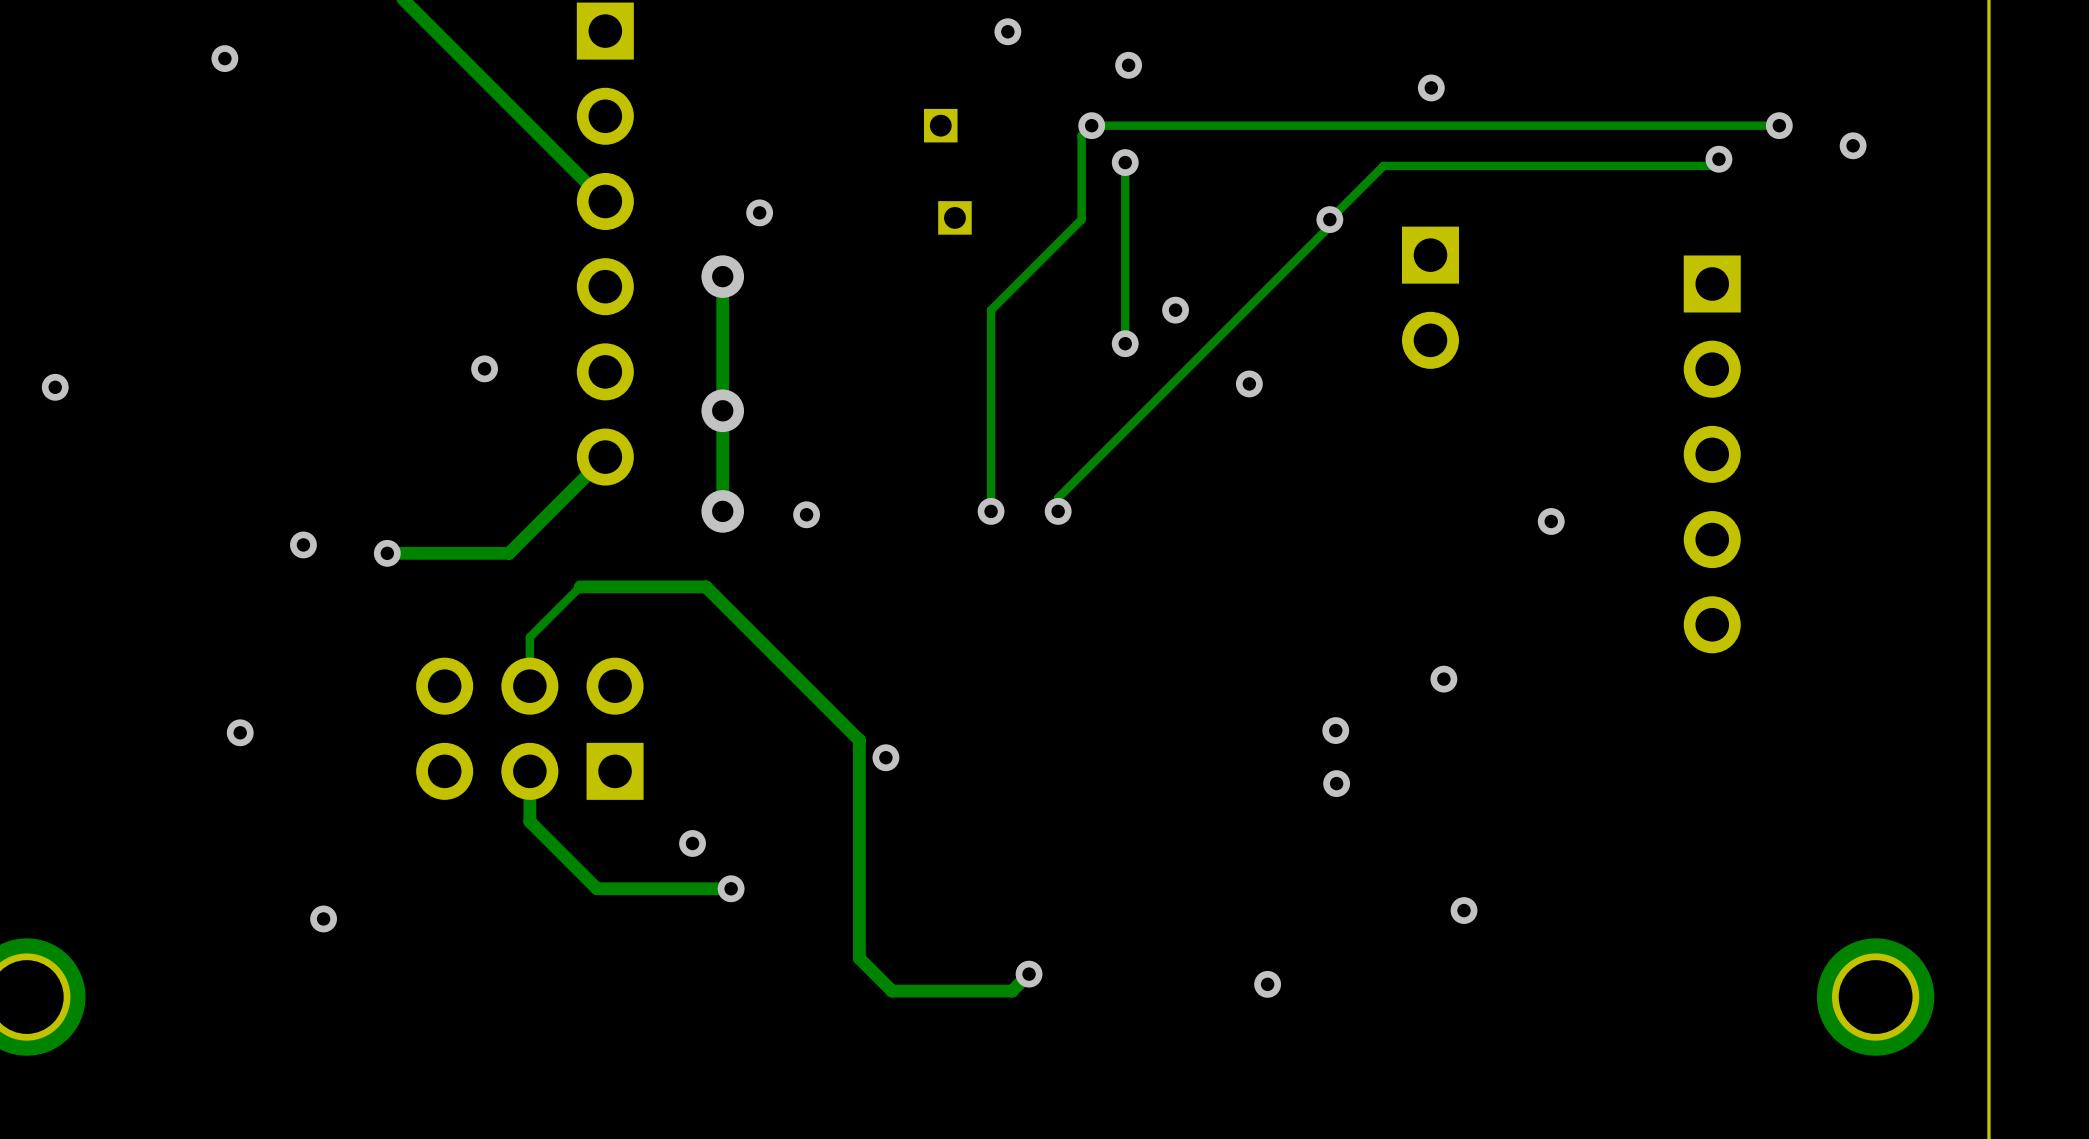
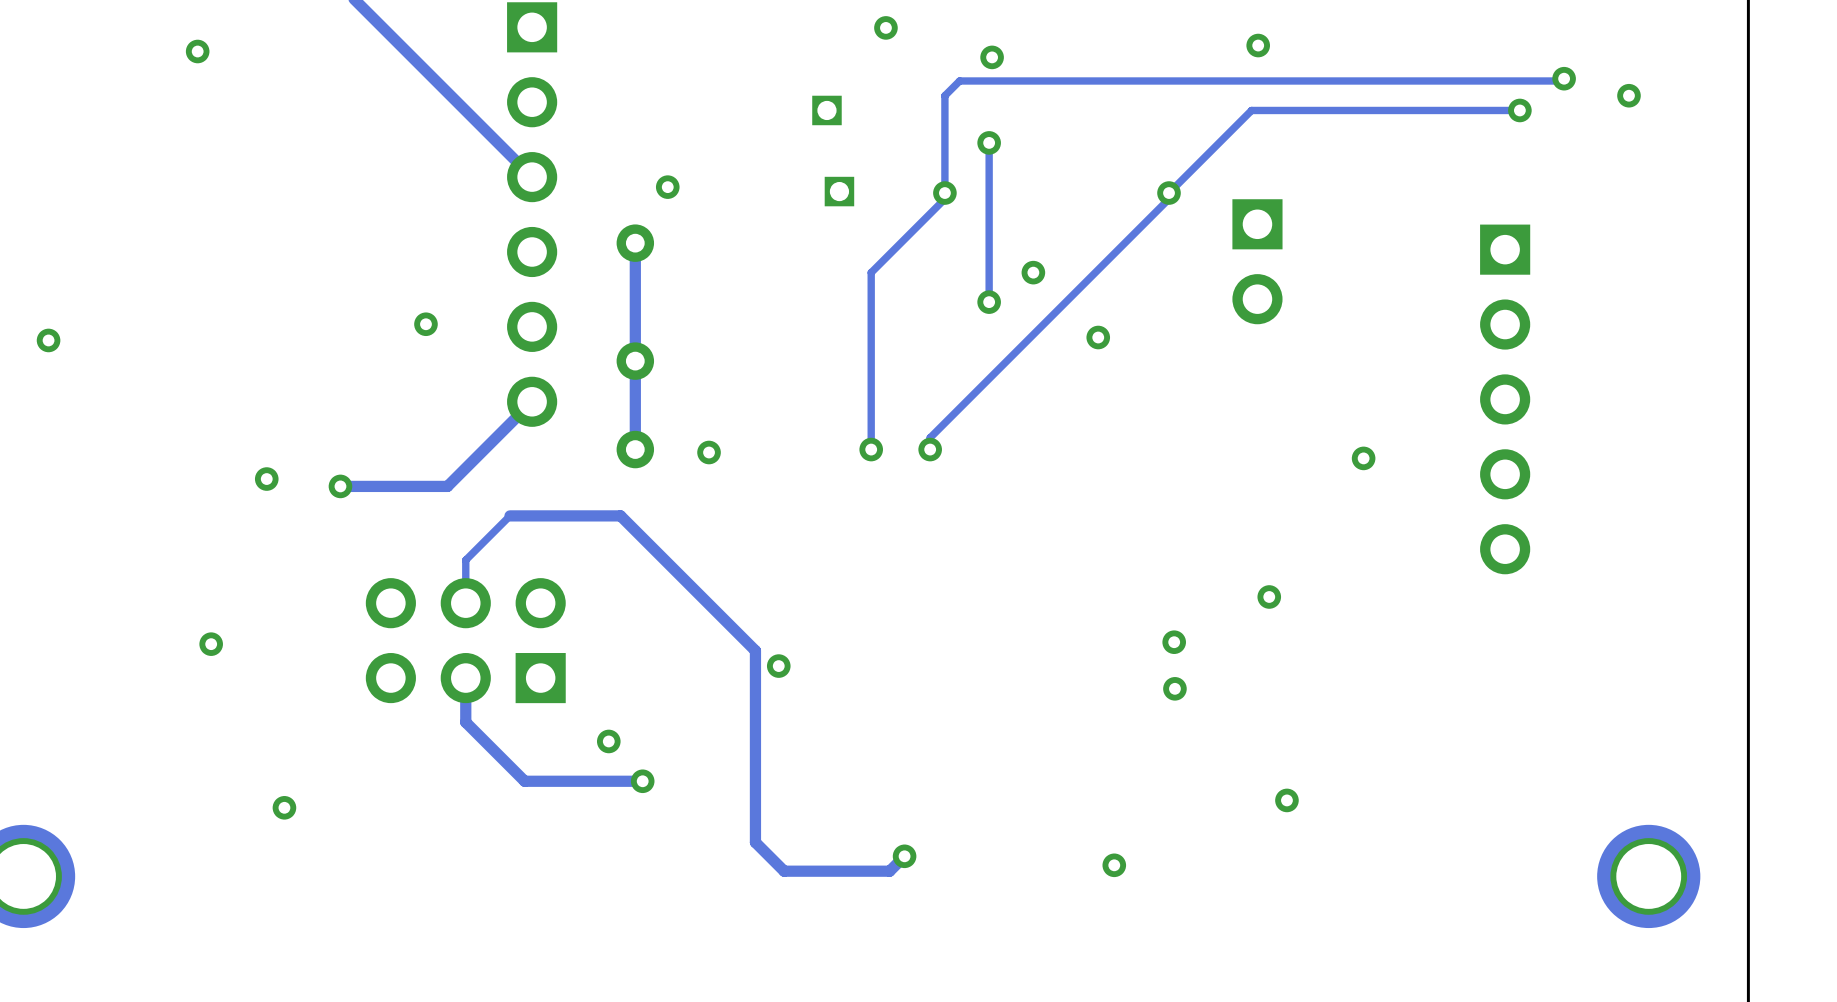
via position: (1431, 87) -> (1258, 45)
via: none -> (1564, 78)
via position: (1091, 125) -> (944, 193)
track: (1423, 125) (1091, 125) (1081, 135) (1081, 219) (1074, 226) -> (1564, 78) (1561, 80) (959, 80) (944, 95) (944, 198)
via: none -> (1519, 110)
track: (1779, 125) (1729, 125) -> none
via: (1779, 125) -> none
via position: (1853, 145) -> (1628, 95)
track: (1718, 159) (1712, 165) (1383, 165) -> (1251, 110) (1216, 145)
via: (1718, 159) -> none

